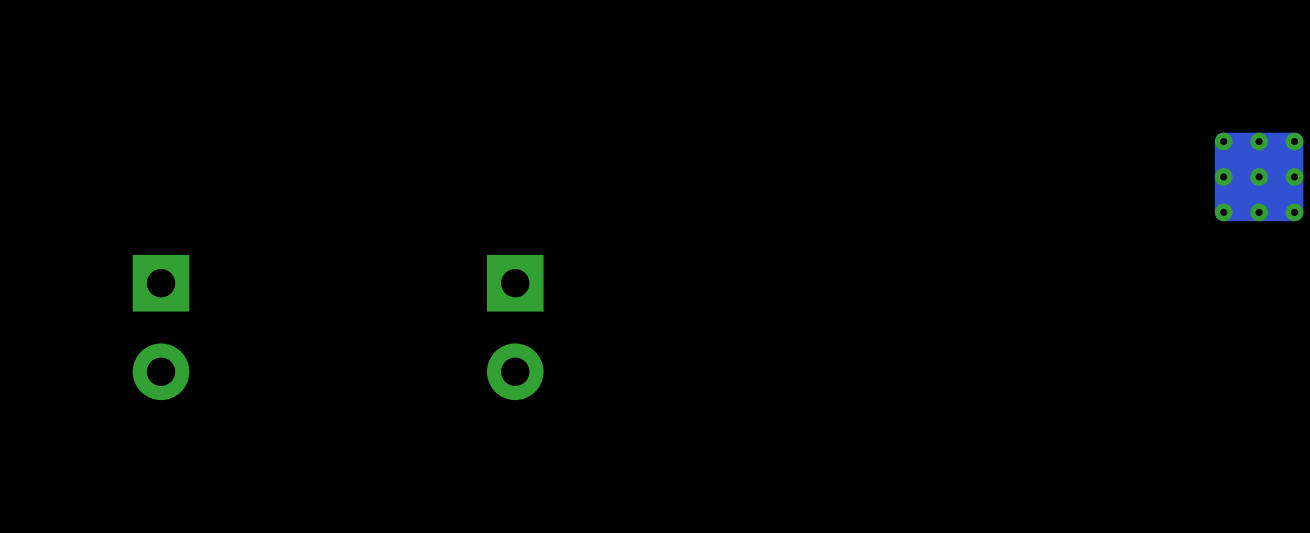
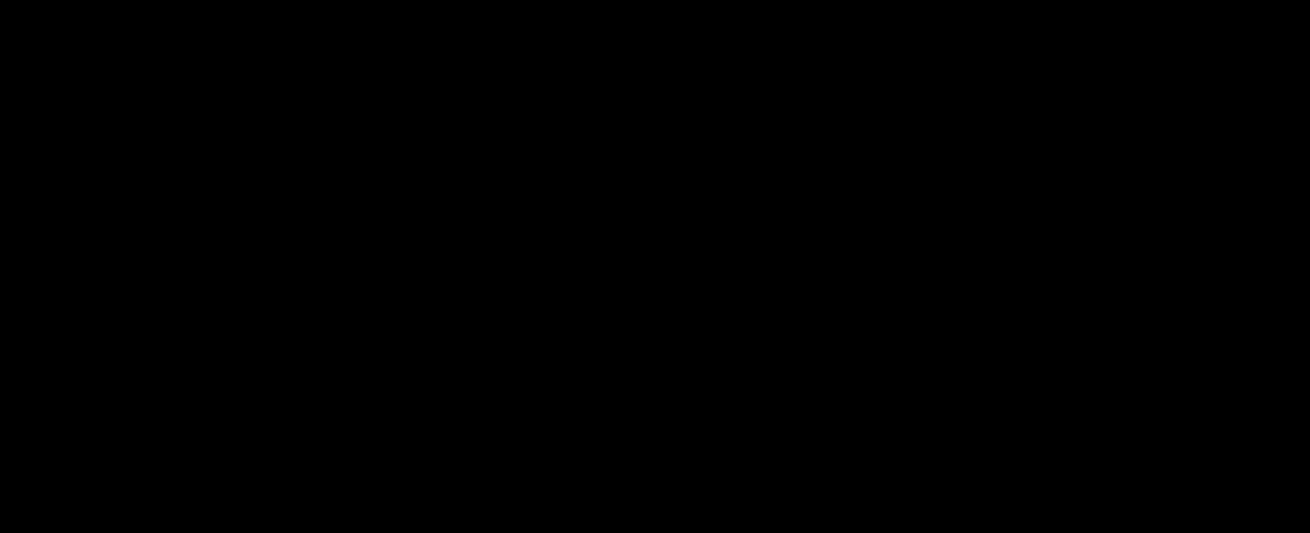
part: (1259, 176) -> none
part: (161, 327) -> none
part: (515, 327) -> none

